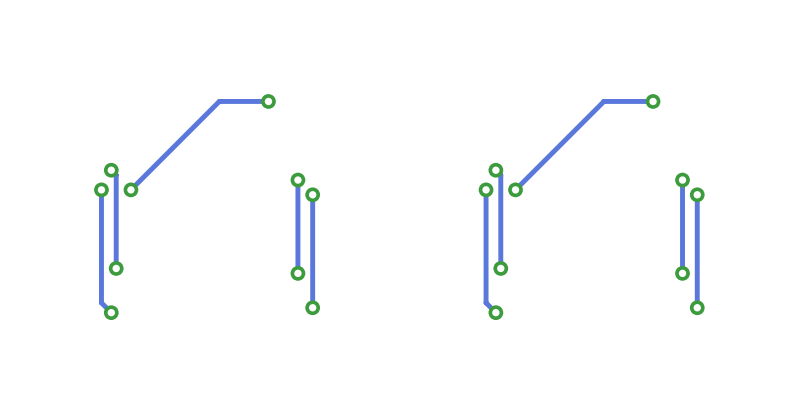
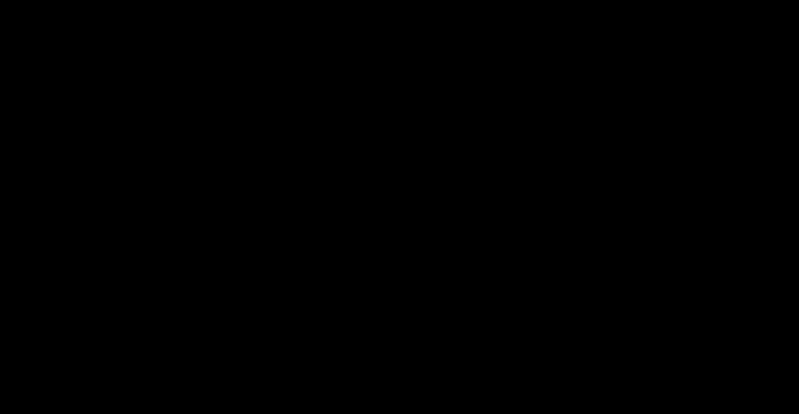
track: (268, 101) (219, 101) (130, 189) -> none
via: (268, 101) -> none
track: (653, 101) (603, 101) (515, 189) -> none
via: (653, 101) -> none
track: (111, 170) (116, 175) (116, 268) -> none
via: (111, 170) -> none
track: (495, 170) (500, 175) (500, 268) -> none
via: (495, 170) -> none
track: (297, 180) (297, 273) -> none
via: (297, 180) -> none
track: (682, 180) (682, 273) -> none
via: (682, 180) -> none
track: (101, 189) (101, 302) (111, 312) -> none
via: (101, 189) -> none
via: (130, 189) -> none
track: (486, 189) (486, 302) (495, 312) -> none
via: (486, 189) -> none
via: (515, 189) -> none
track: (312, 194) (312, 307) -> none
via: (312, 194) -> none
track: (697, 194) (697, 307) -> none
via: (697, 194) -> none
via: (116, 268) -> none
via: (500, 268) -> none
via: (297, 273) -> none
via: (682, 273) -> none
via: (312, 307) -> none
via: (697, 307) -> none
via: (111, 312) -> none
via: (495, 312) -> none

